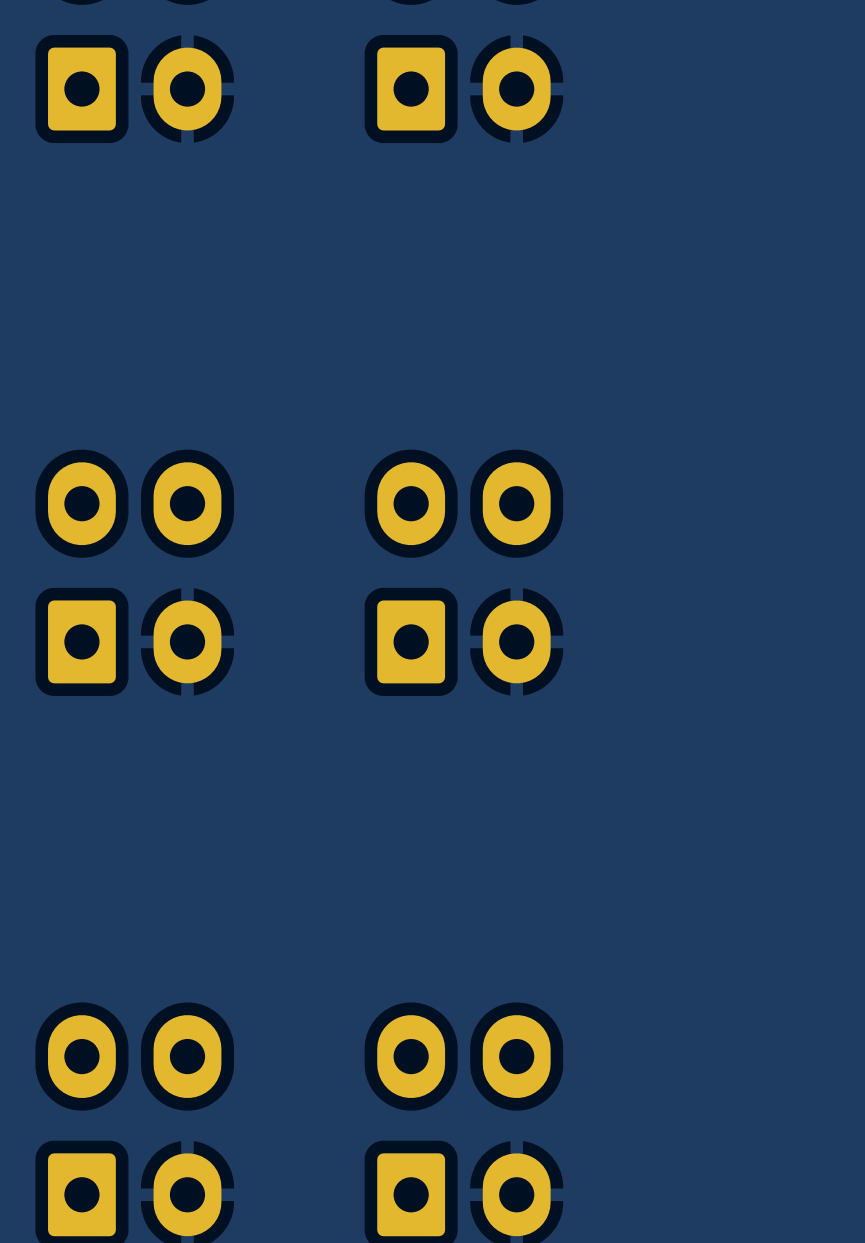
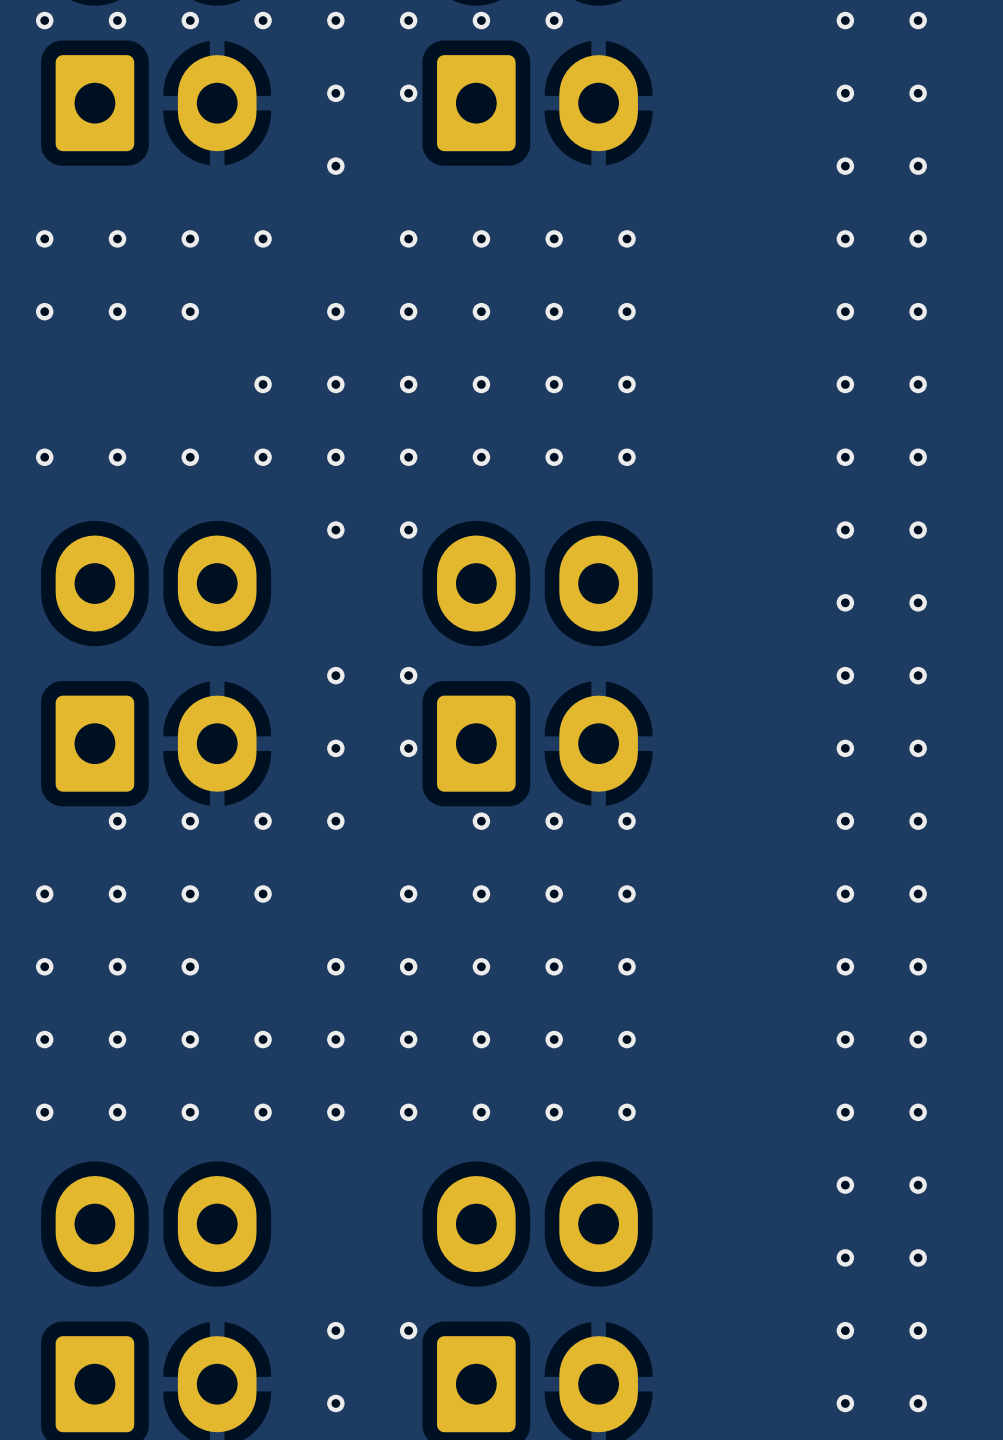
via: none -> (44, 20)
via: none -> (117, 20)
via: none -> (190, 20)
via: none -> (263, 20)
via: none -> (335, 20)
via: none -> (408, 20)
via: none -> (481, 20)
via: none -> (554, 20)
via: none -> (845, 20)
via: none -> (918, 20)
via: none -> (335, 93)
via: none -> (408, 93)
via: none -> (845, 93)
via: none -> (918, 93)
via: none -> (335, 166)
via: none -> (845, 166)
via: none -> (918, 166)
via: none -> (44, 238)
via: none -> (117, 238)
via: none -> (190, 238)
via: none -> (263, 238)
via: none -> (408, 238)
via: none -> (481, 238)
via: none -> (554, 238)
via: none -> (627, 238)
via: none -> (845, 238)
via: none -> (918, 238)
via: none -> (44, 311)
via: none -> (117, 311)
via: none -> (190, 311)
via: none -> (335, 311)
via: none -> (408, 311)
via: none -> (481, 311)
via: none -> (554, 311)
via: none -> (627, 311)
via: none -> (845, 311)
via: none -> (918, 311)
via: none -> (263, 384)
via: none -> (335, 384)
via: none -> (408, 384)
via: none -> (481, 384)
via: none -> (554, 384)
via: none -> (627, 384)
via: none -> (845, 384)
via: none -> (918, 384)
via: none -> (44, 457)
via: none -> (117, 457)
via: none -> (190, 457)
via: none -> (263, 457)
via: none -> (335, 457)
via: none -> (408, 457)
via: none -> (481, 457)
via: none -> (554, 457)
via: none -> (627, 457)
via: none -> (845, 457)
via: none -> (918, 457)
via: none -> (335, 530)
via: none -> (408, 530)
via: none -> (845, 530)
via: none -> (918, 530)
via: none -> (845, 602)
via: none -> (918, 602)
via: none -> (335, 675)
via: none -> (408, 675)
via: none -> (845, 675)
via: none -> (918, 675)
via: none -> (335, 748)
via: none -> (408, 748)
via: none -> (845, 748)
via: none -> (918, 748)
via: none -> (117, 821)
via: none -> (190, 821)
via: none -> (263, 821)
via: none -> (335, 821)
via: none -> (481, 821)
via: none -> (554, 821)
via: none -> (627, 821)
via: none -> (845, 821)
via: none -> (918, 821)
via: none -> (44, 893)
via: none -> (117, 893)
via: none -> (190, 893)
via: none -> (263, 893)
via: none -> (408, 893)
via: none -> (481, 893)
via: none -> (554, 893)
via: none -> (627, 893)
via: none -> (845, 893)
via: none -> (918, 893)
via: none -> (44, 966)
via: none -> (117, 966)
via: none -> (190, 966)
via: none -> (335, 966)
via: none -> (408, 966)
via: none -> (481, 966)
via: none -> (554, 966)
via: none -> (627, 966)
via: none -> (845, 966)
via: none -> (918, 966)
via: none -> (44, 1039)
via: none -> (117, 1039)
via: none -> (190, 1039)
via: none -> (263, 1039)
via: none -> (335, 1039)
via: none -> (408, 1039)
via: none -> (481, 1039)
via: none -> (554, 1039)
via: none -> (627, 1039)
via: none -> (845, 1039)
via: none -> (918, 1039)
via: none -> (44, 1112)
via: none -> (117, 1112)
via: none -> (190, 1112)
via: none -> (263, 1112)
via: none -> (335, 1112)
via: none -> (408, 1112)
via: none -> (481, 1112)
via: none -> (554, 1112)
via: none -> (627, 1112)
via: none -> (845, 1112)
via: none -> (918, 1112)
via: none -> (845, 1185)
via: none -> (918, 1185)
via: none -> (845, 1257)
via: none -> (918, 1257)
via: none -> (335, 1330)
via: none -> (408, 1330)
via: none -> (845, 1330)
via: none -> (918, 1330)
via: none -> (335, 1403)
via: none -> (845, 1403)
via: none -> (918, 1403)

